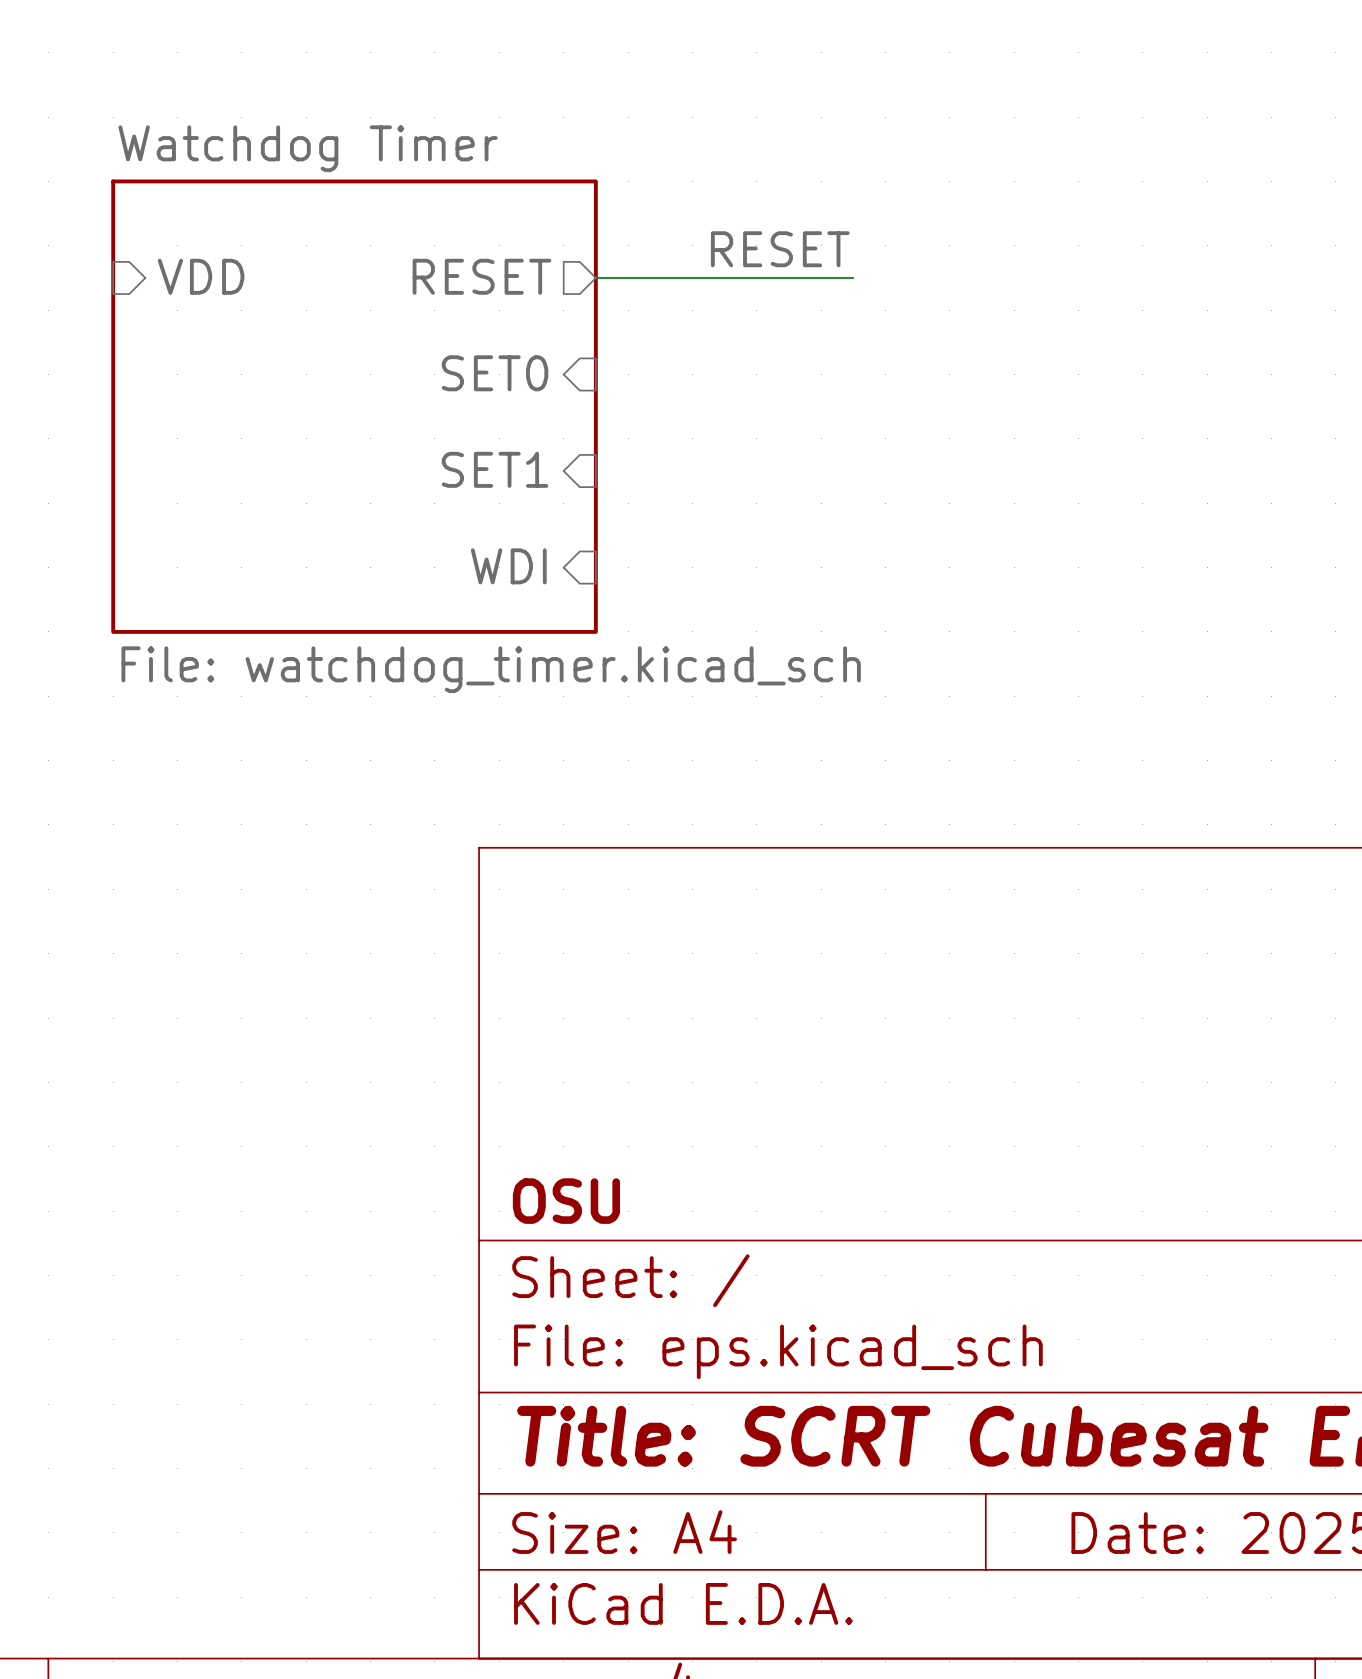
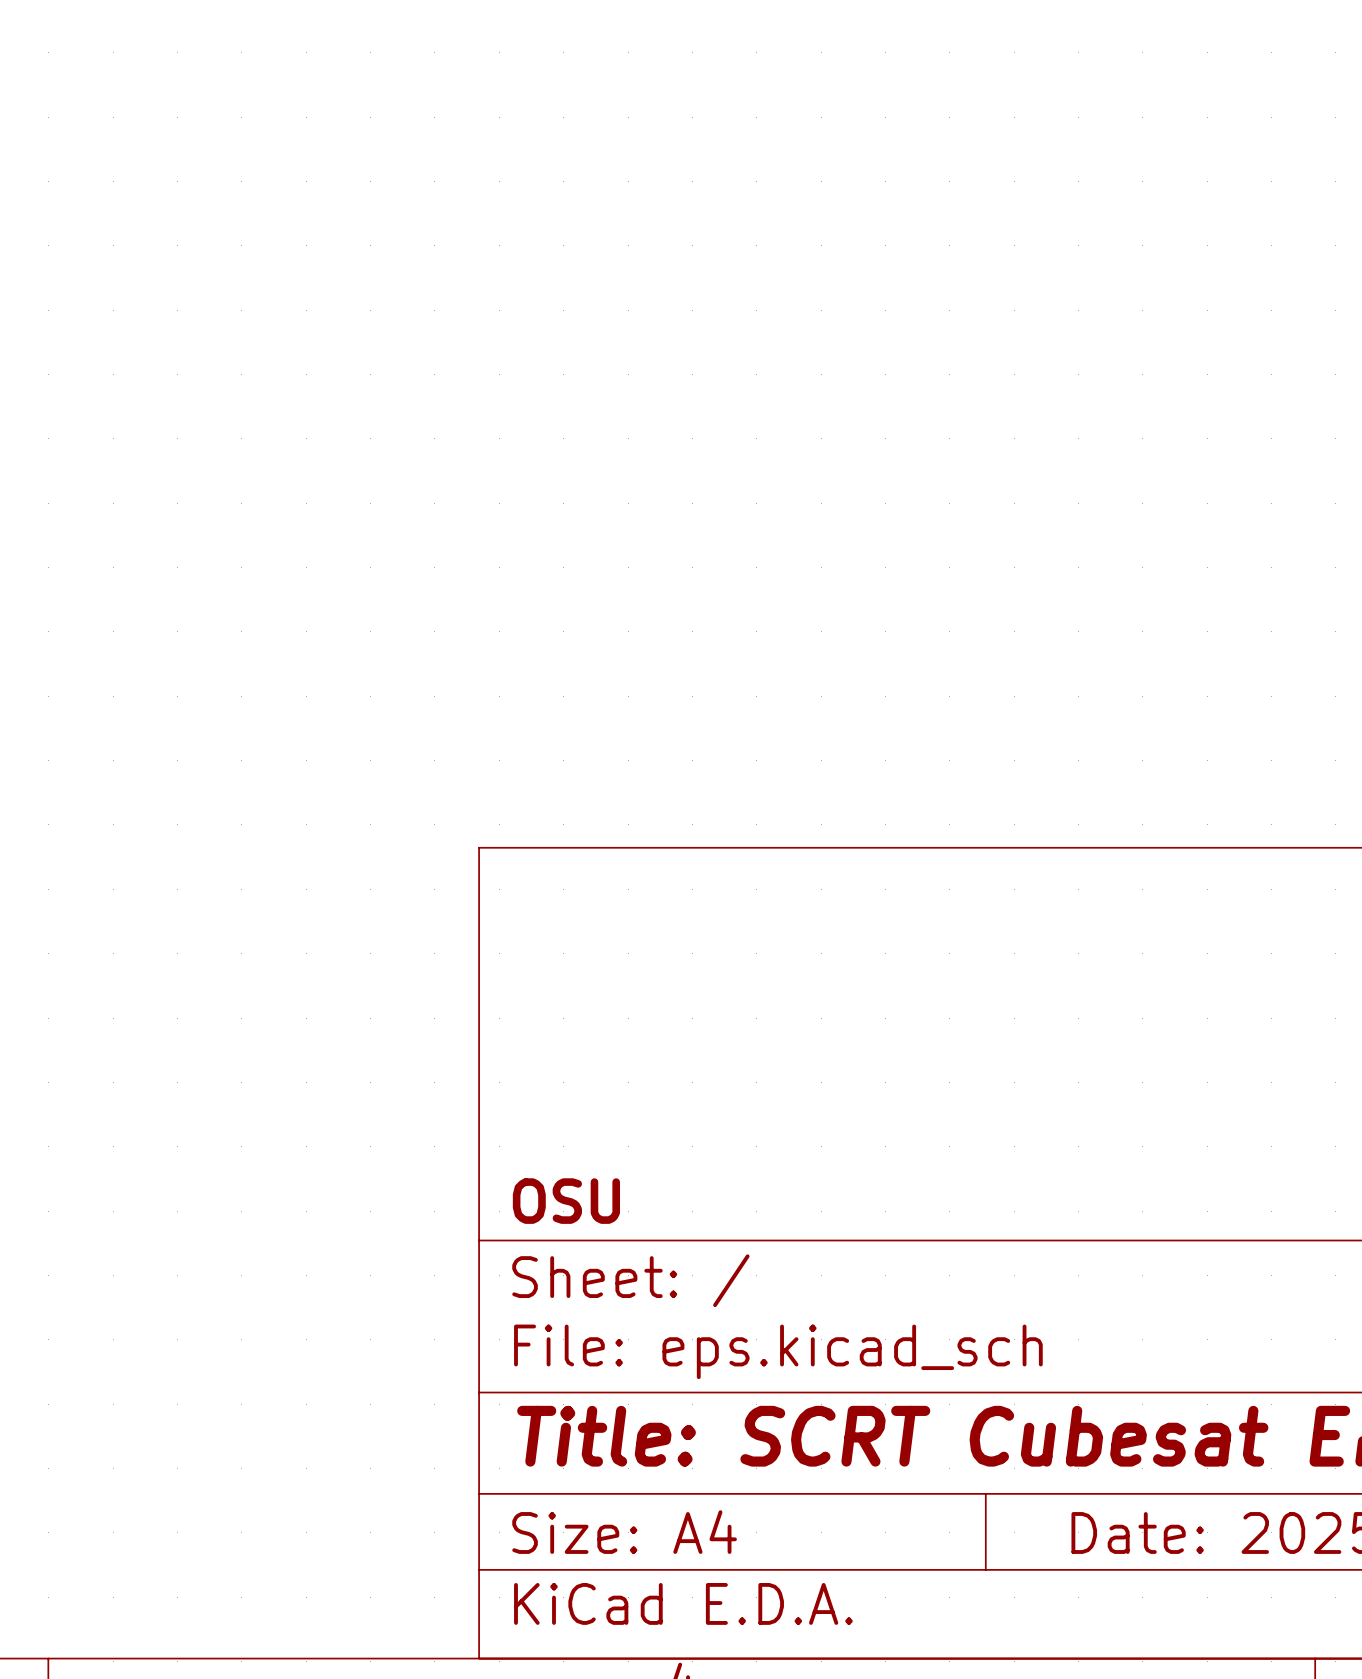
label: RESET (780, 249) -> none
sheet pin: VDD (201, 276) -> none
sheet pin: RESET (481, 276) -> none
wire: (595, 277) (853, 277) -> none
sheet pin: SET0 (495, 373) -> none
sheet Watchdog Timer: File: watchdog_timer.kicad_sch (354, 406) -> none
sheet pin: SET1 (495, 469) -> none
sheet pin: WDI (508, 566) -> none

